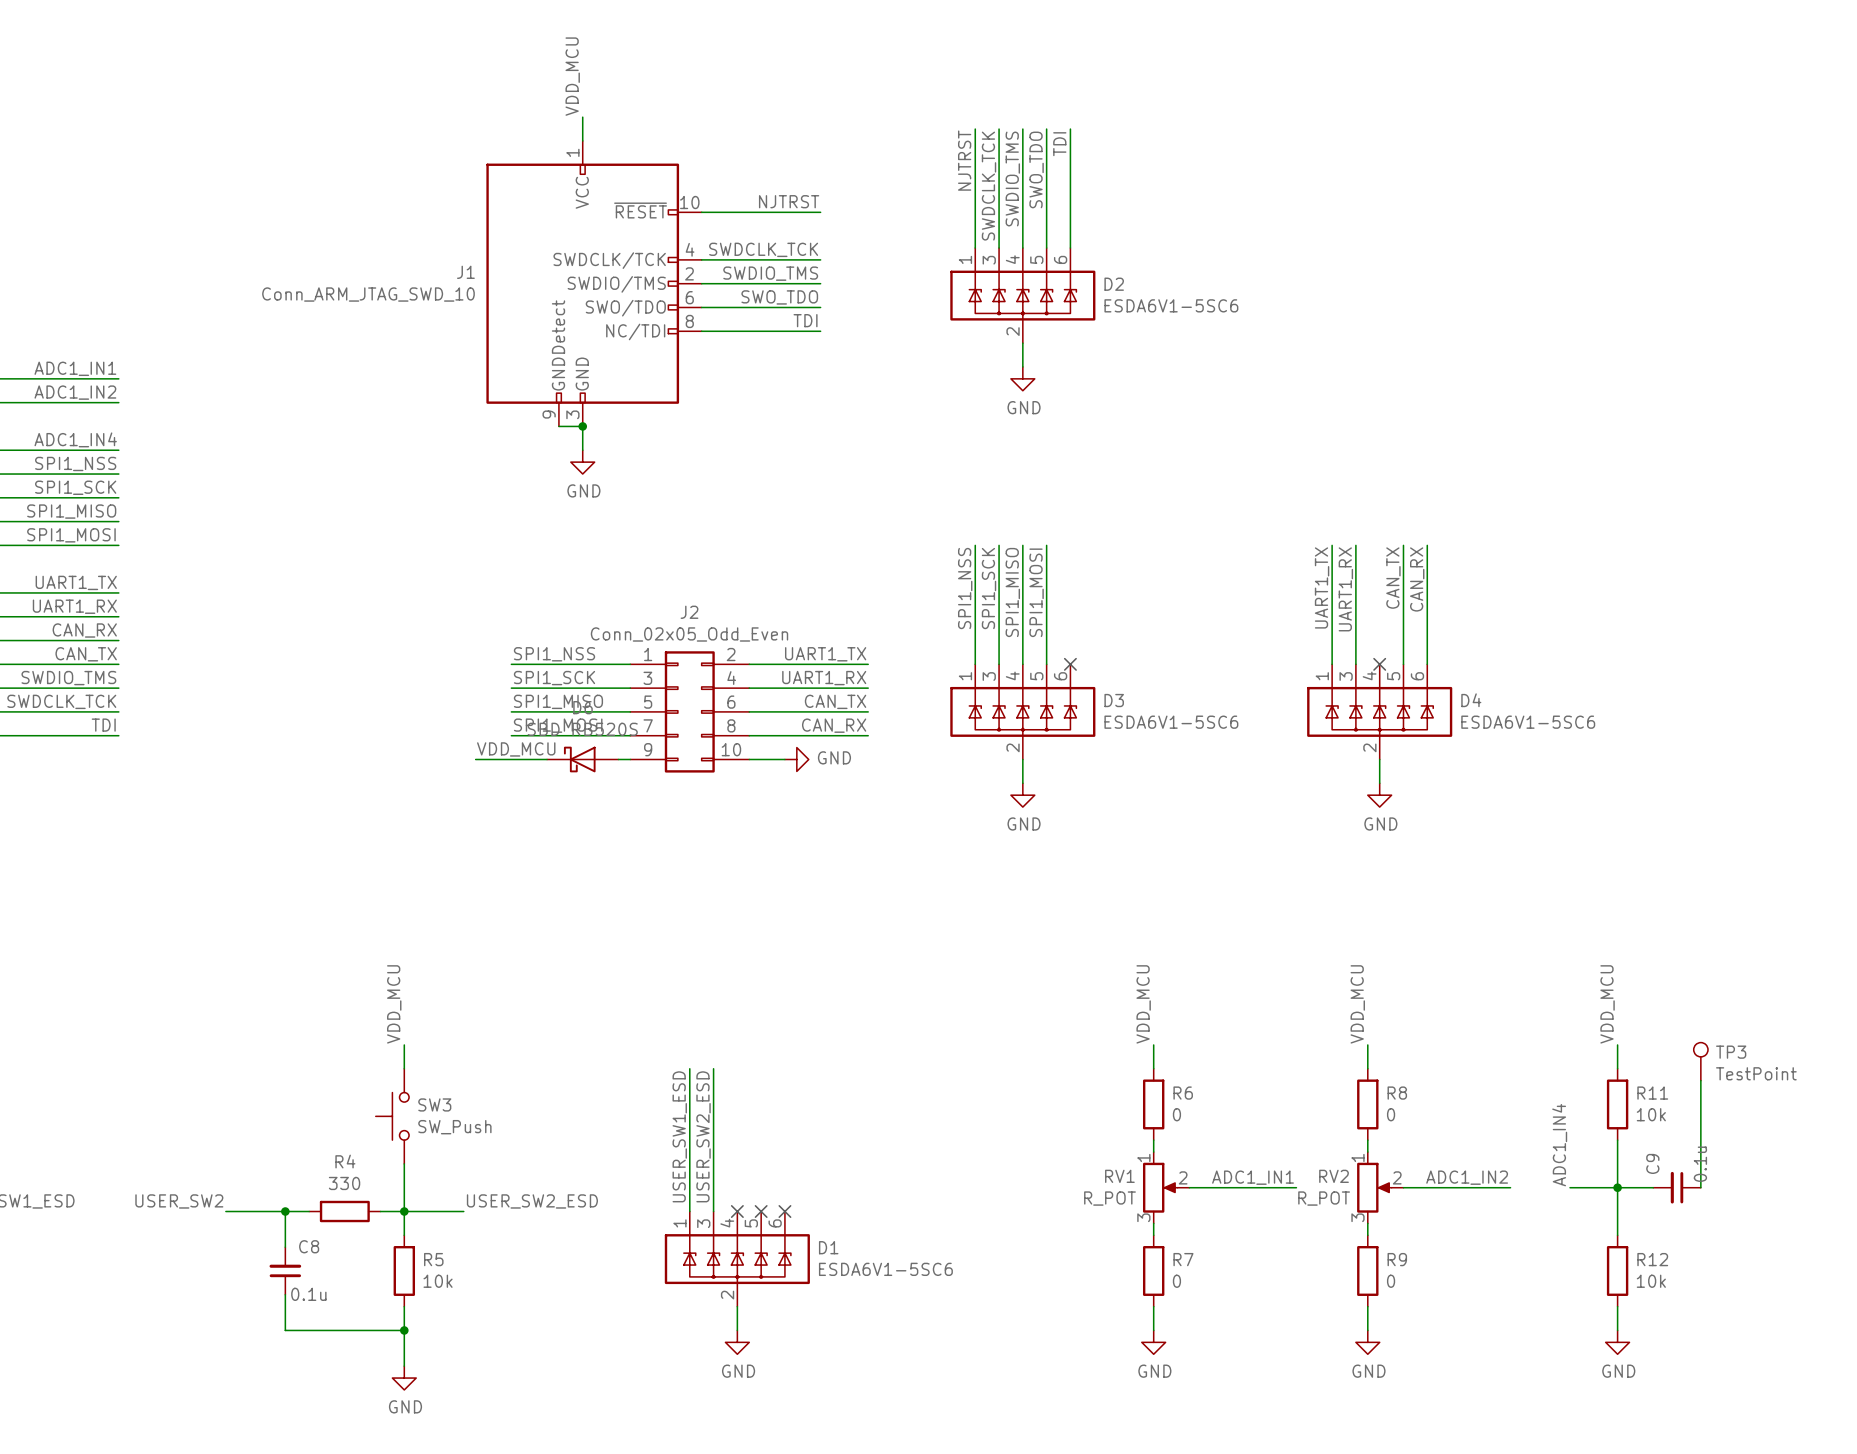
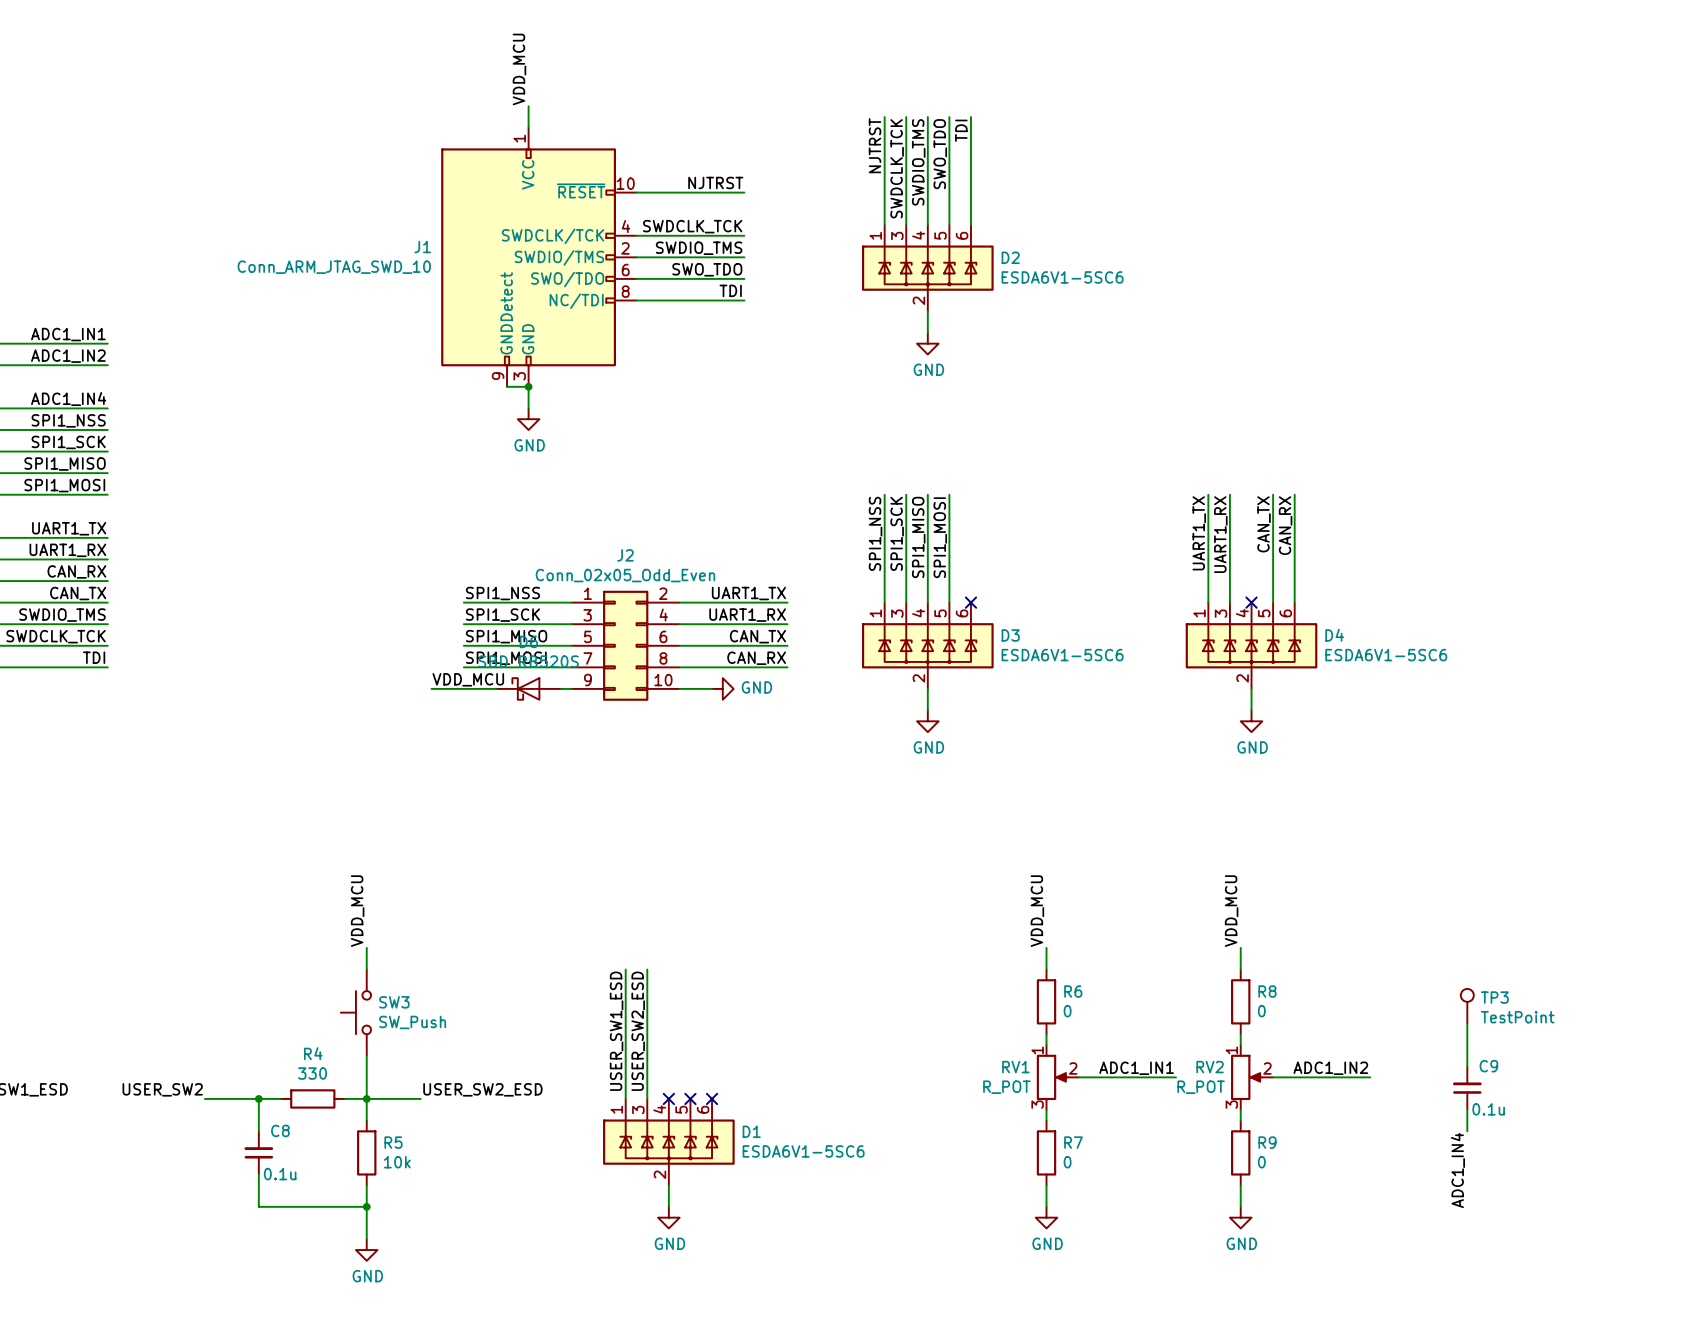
label: VDD_MCU (1607, 1004) -> none
wire: (1617, 1044) (1617, 1068) -> none
TP3 position: (1700, 1061) -> (1467, 1006)
wire: (1700, 1080) (1700, 1187) -> none
R11: 10k (1617, 1104) -> none
label position: ADC1_IN4 (1559, 1145) -> ADC1_IN4 (1457, 1170)
wire: (1570, 1187) (1653, 1187) -> none
junction: (1617, 1187) -> none
C9 rotation: 0° (1677, 1187) -> 90° clockwise (1467, 1088)
C9 position: (1677, 1187) -> (1467, 1088)
R12: 10k (1617, 1270) -> none
wire: (1617, 1306) (1617, 1330) -> none
power symbol: GND (1617, 1342) -> none

